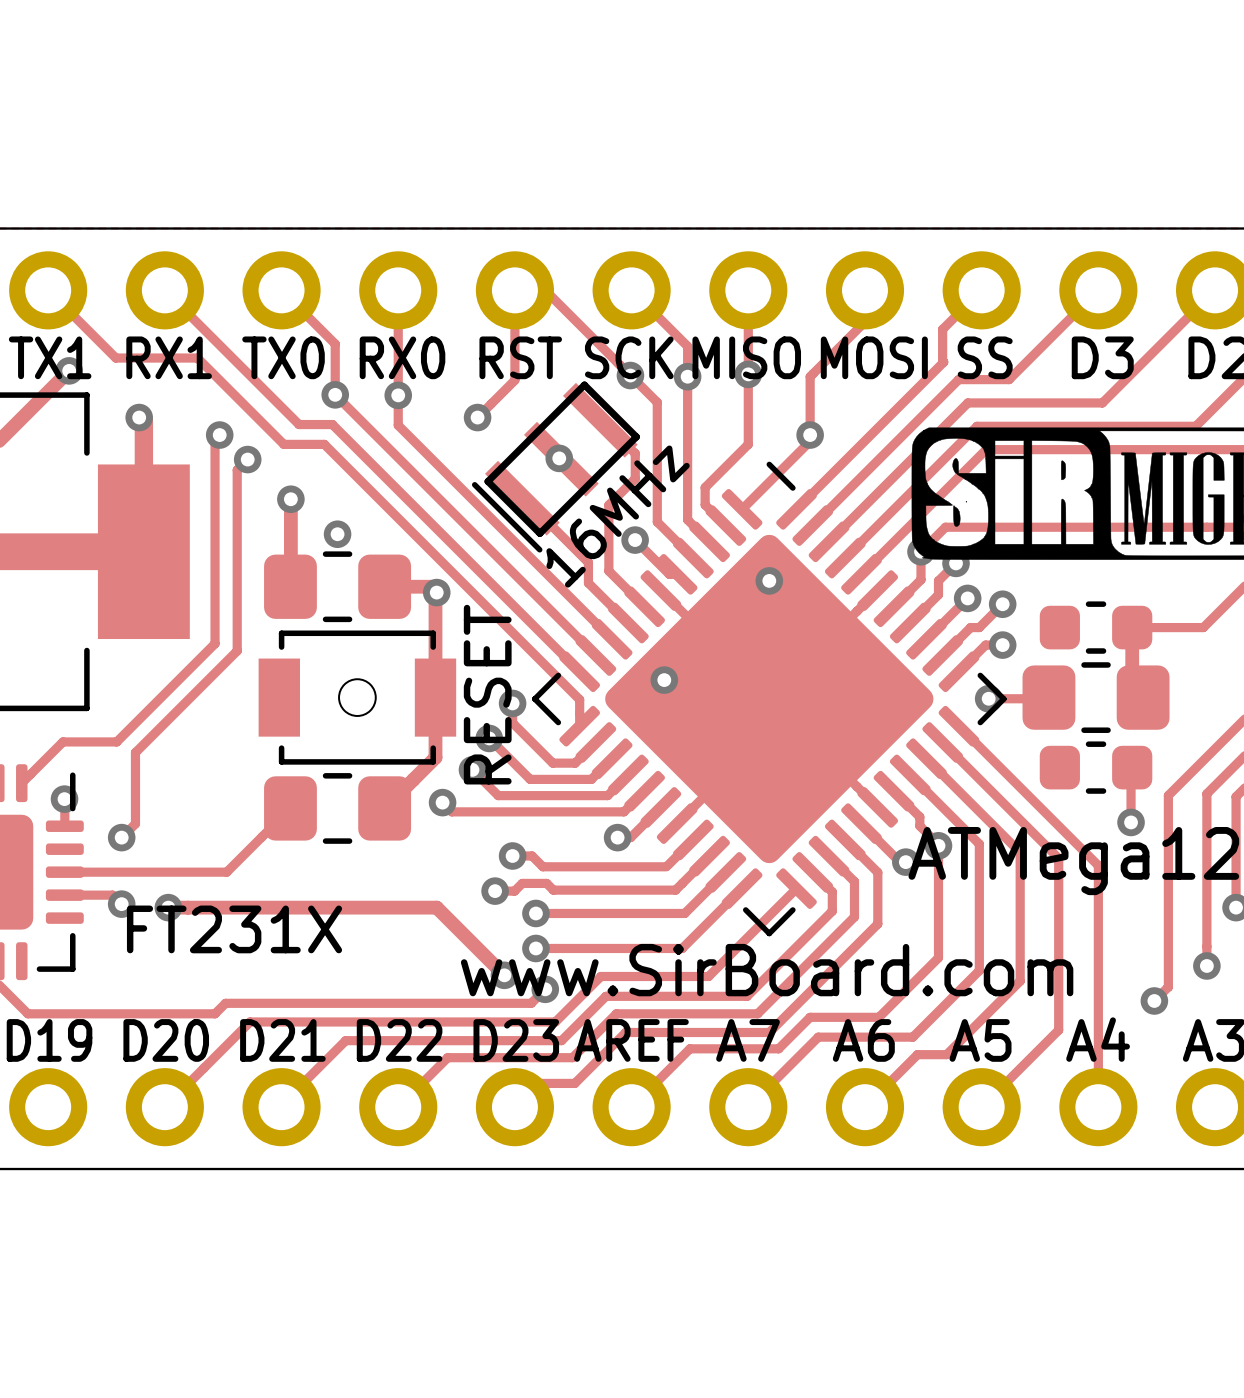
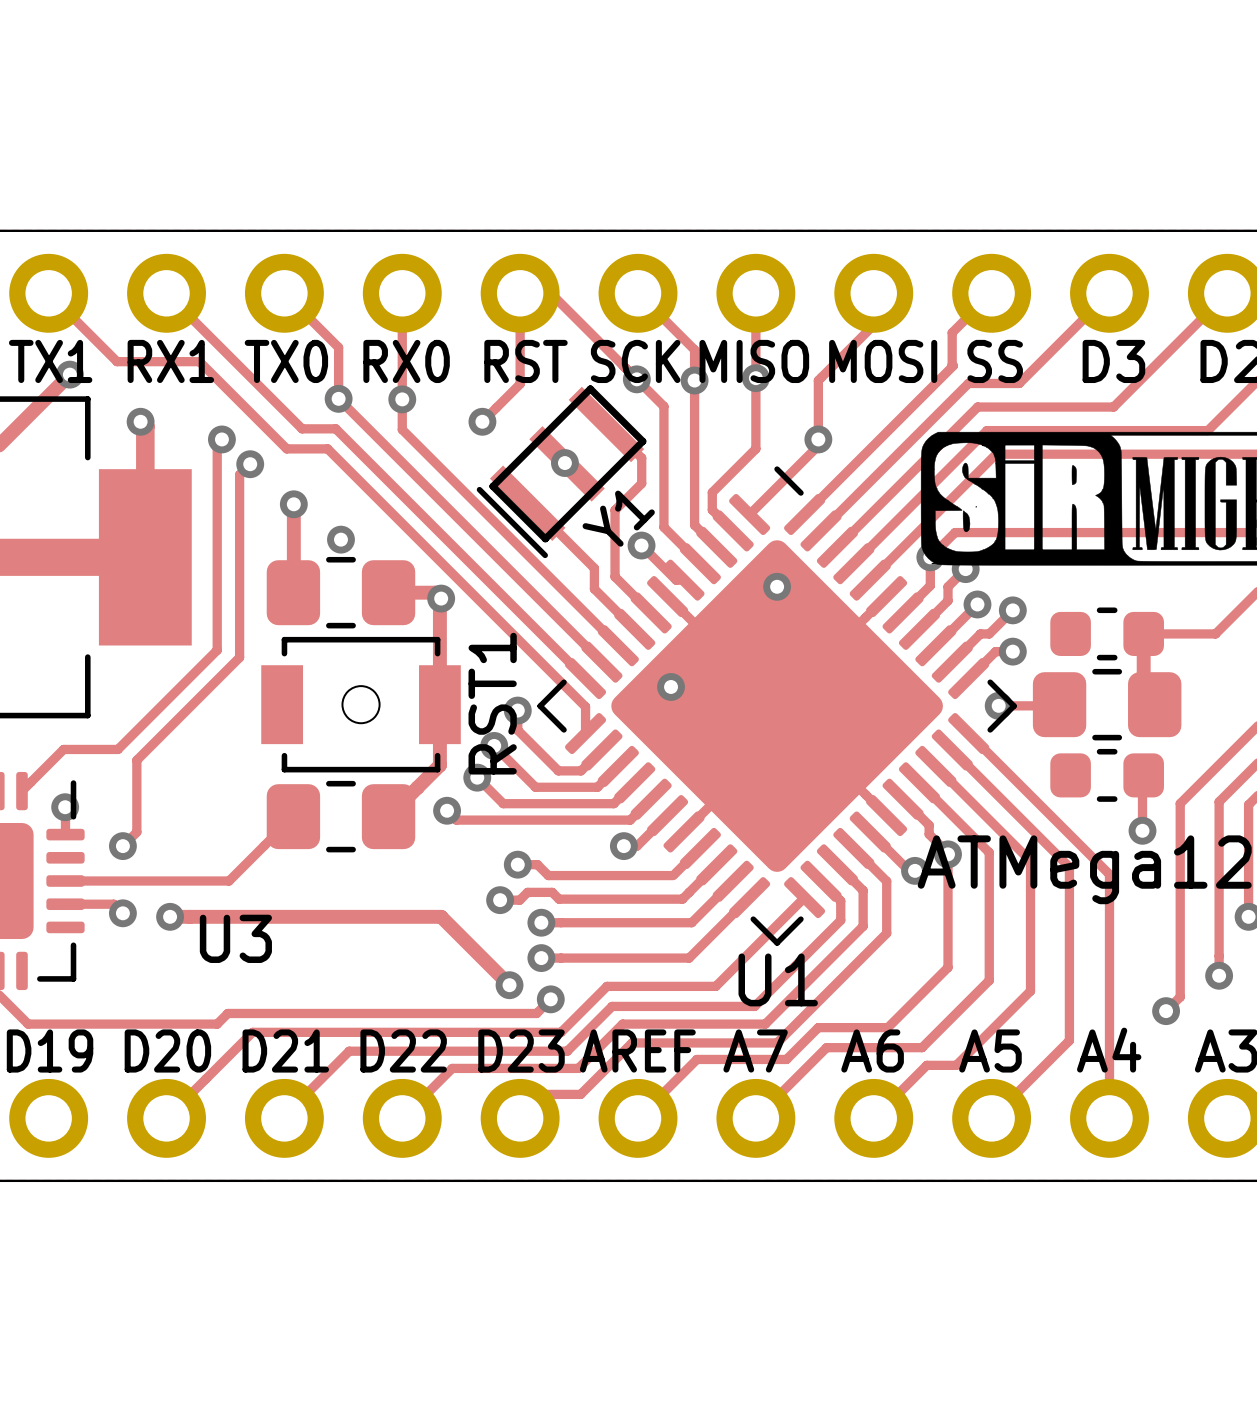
16MHz name: 16MHz (618, 516) -> Y1 (618, 518)
RESET name: RESET (487, 694) -> RST1 (492, 703)
FT231X name: FT231X (234, 929) -> U3 (235, 938)
www.SirBoard.com name: www.SirBoard.com (767, 970) -> U1 (778, 979)

